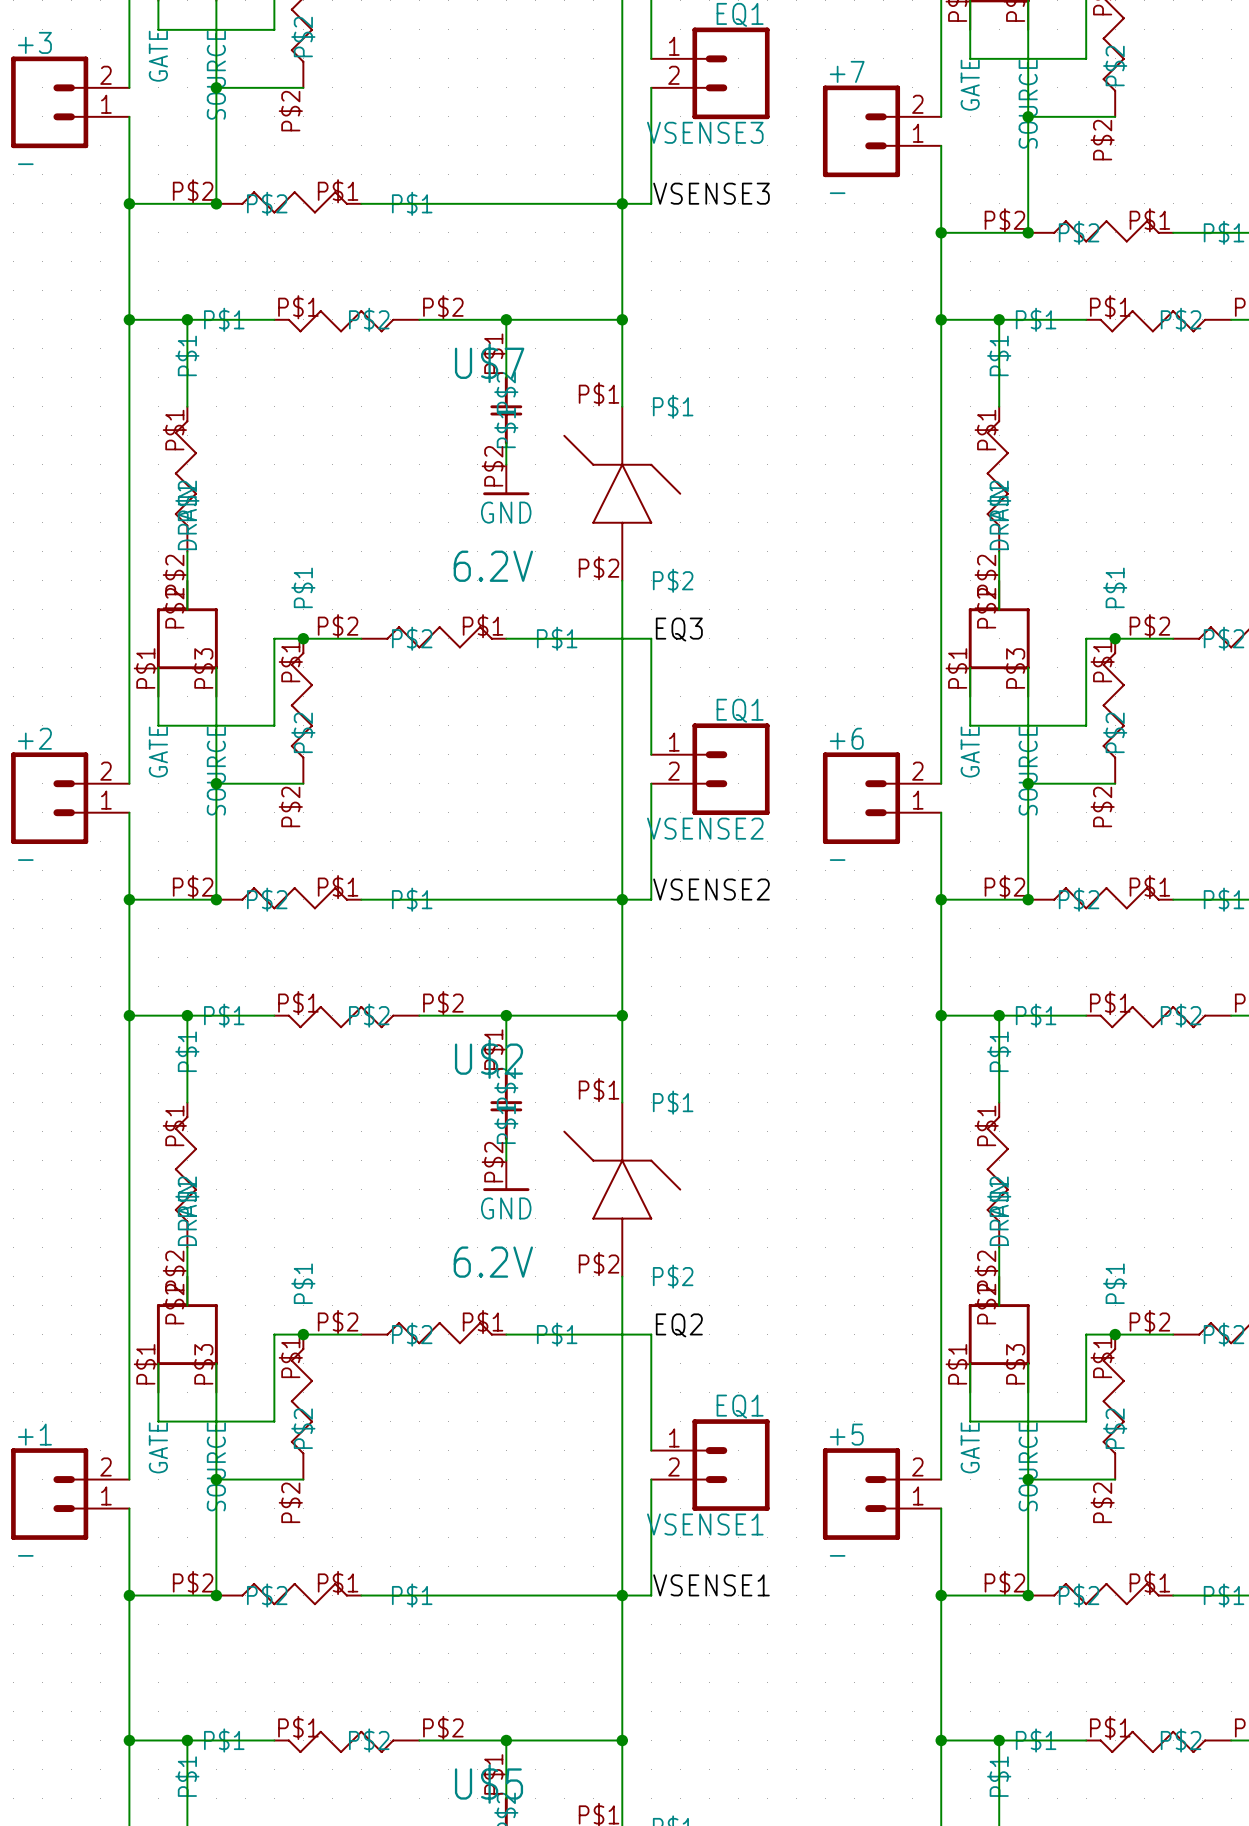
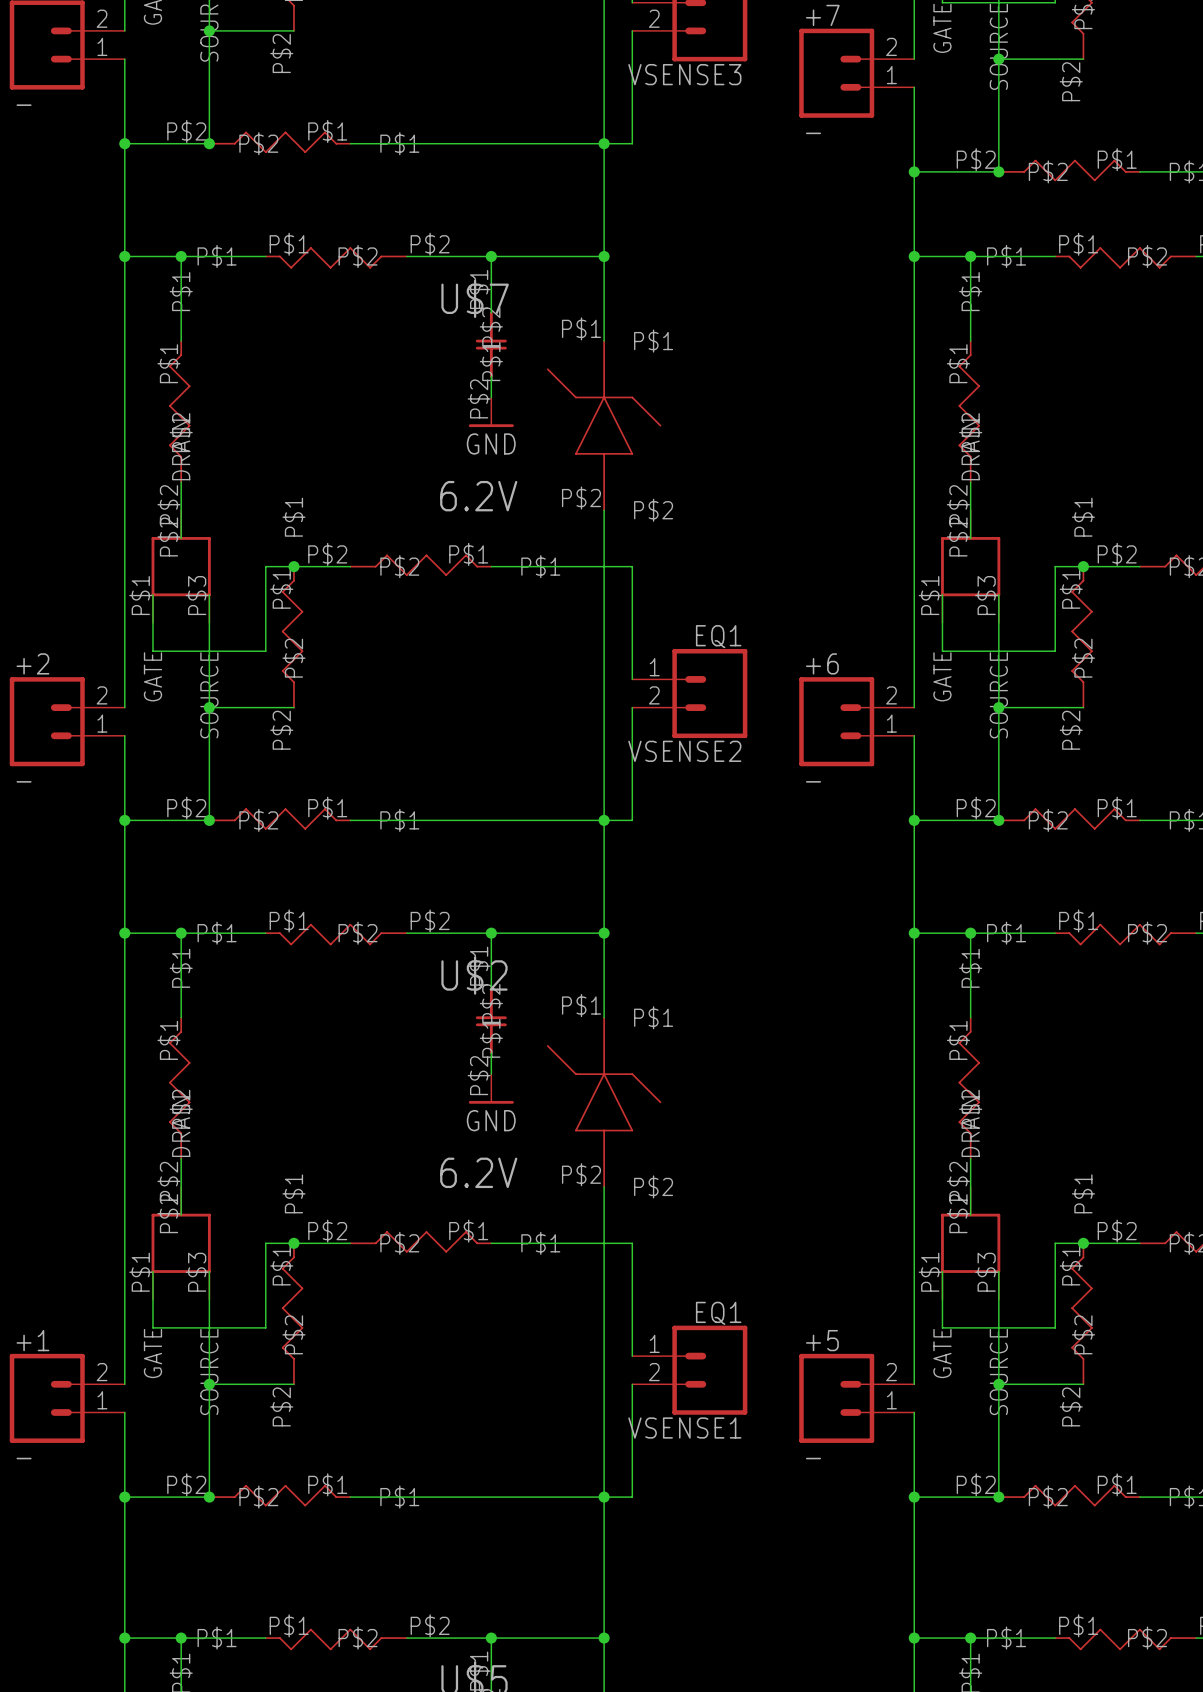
label: VSENSE3 (711, 193) -> none
label: EQ3 (679, 629) -> none
label: VSENSE2 (711, 889) -> none
label: EQ2 (679, 1325) -> none
label: VSENSE1 (711, 1585) -> none

